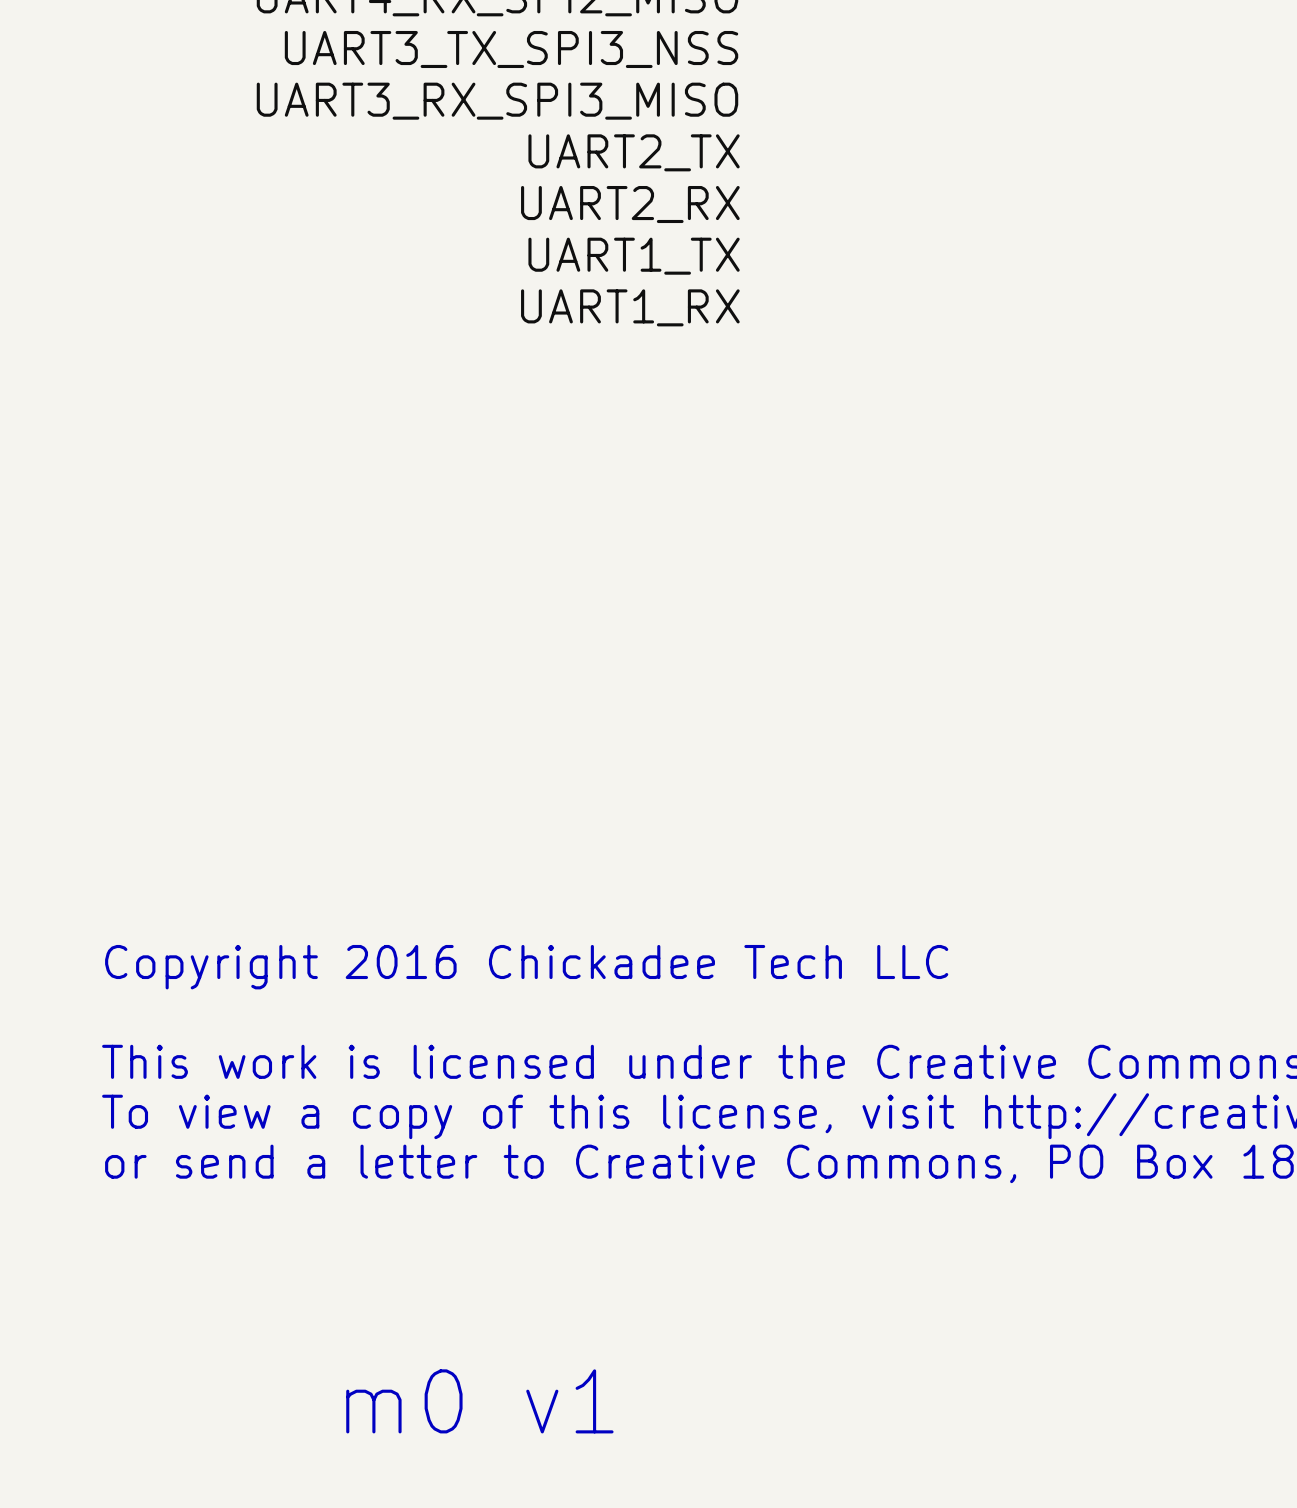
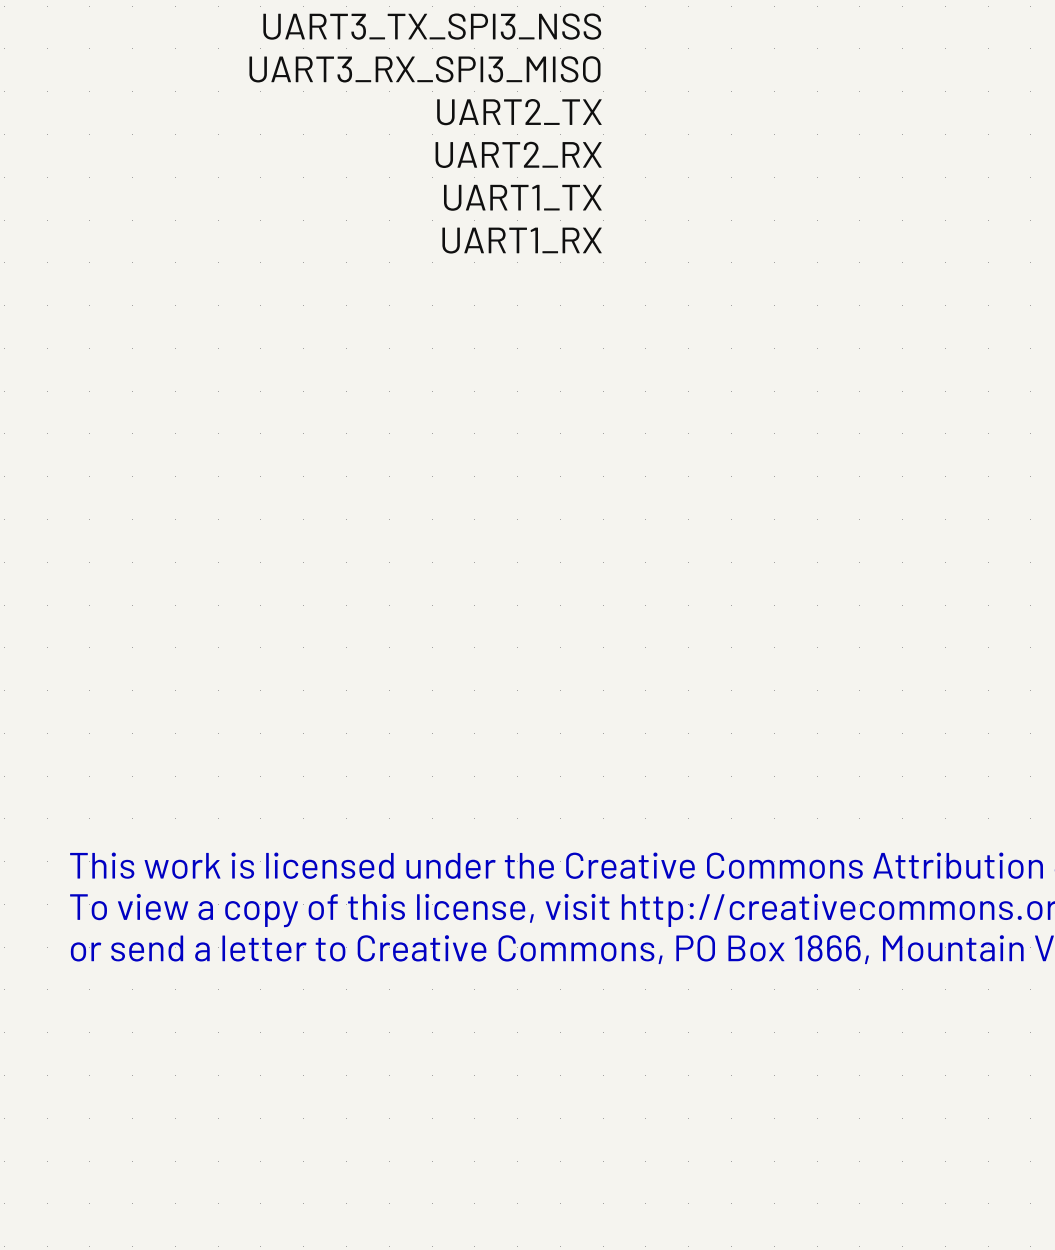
text: Copyright 2016 Chickadee Tech LLC (526, 967) -> none
text: m0 v1 (479, 1401) -> none

